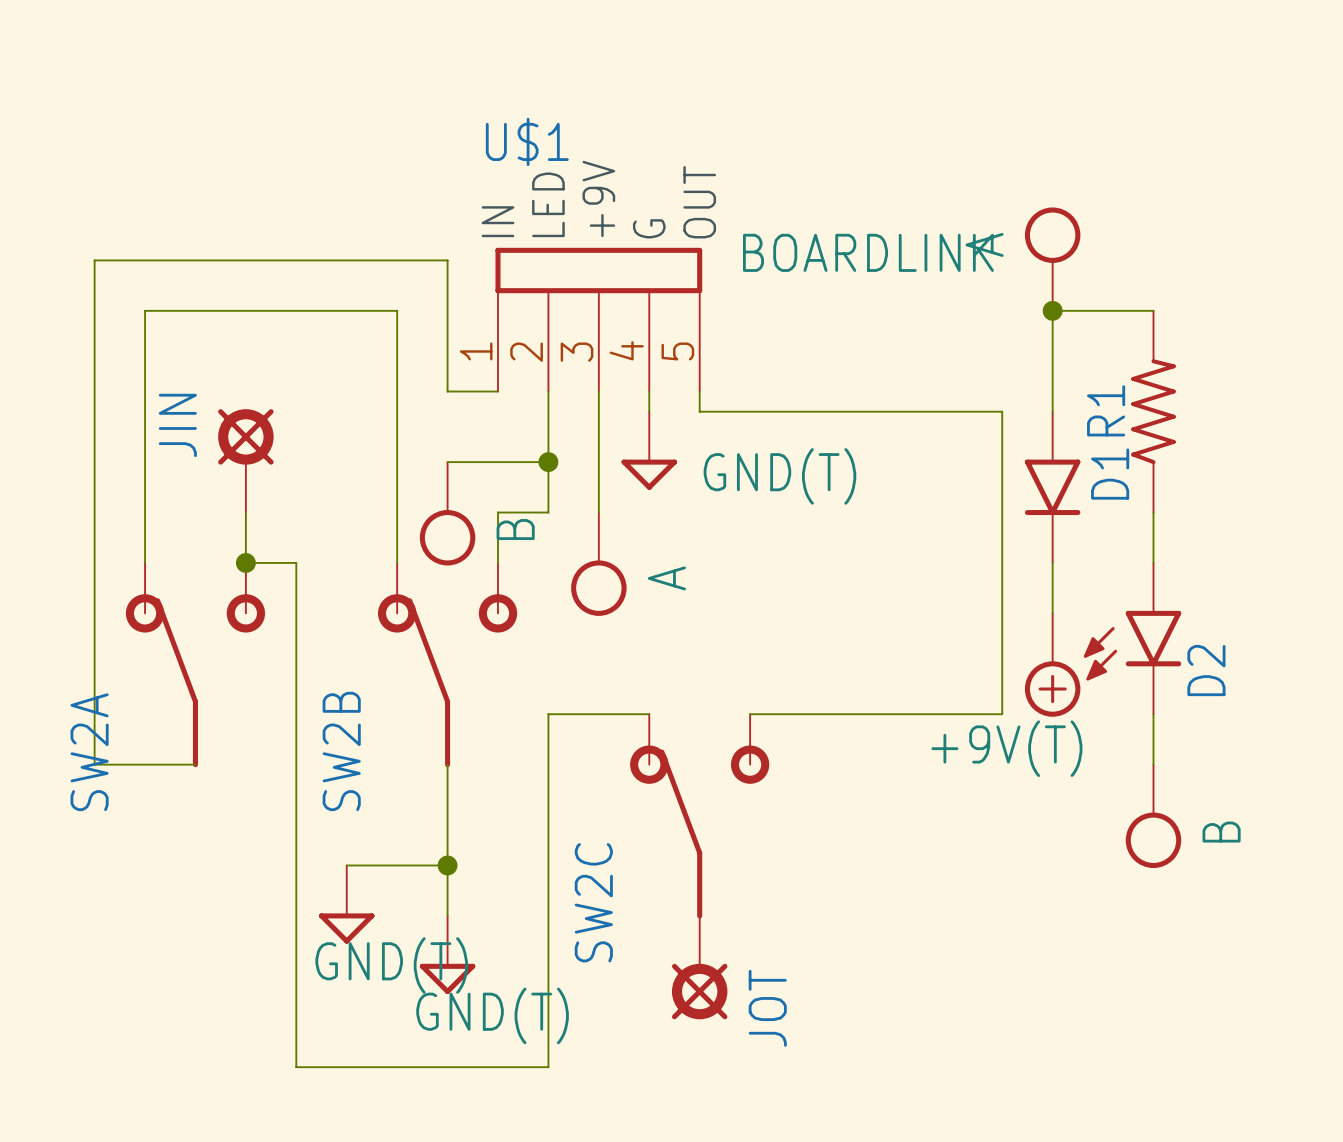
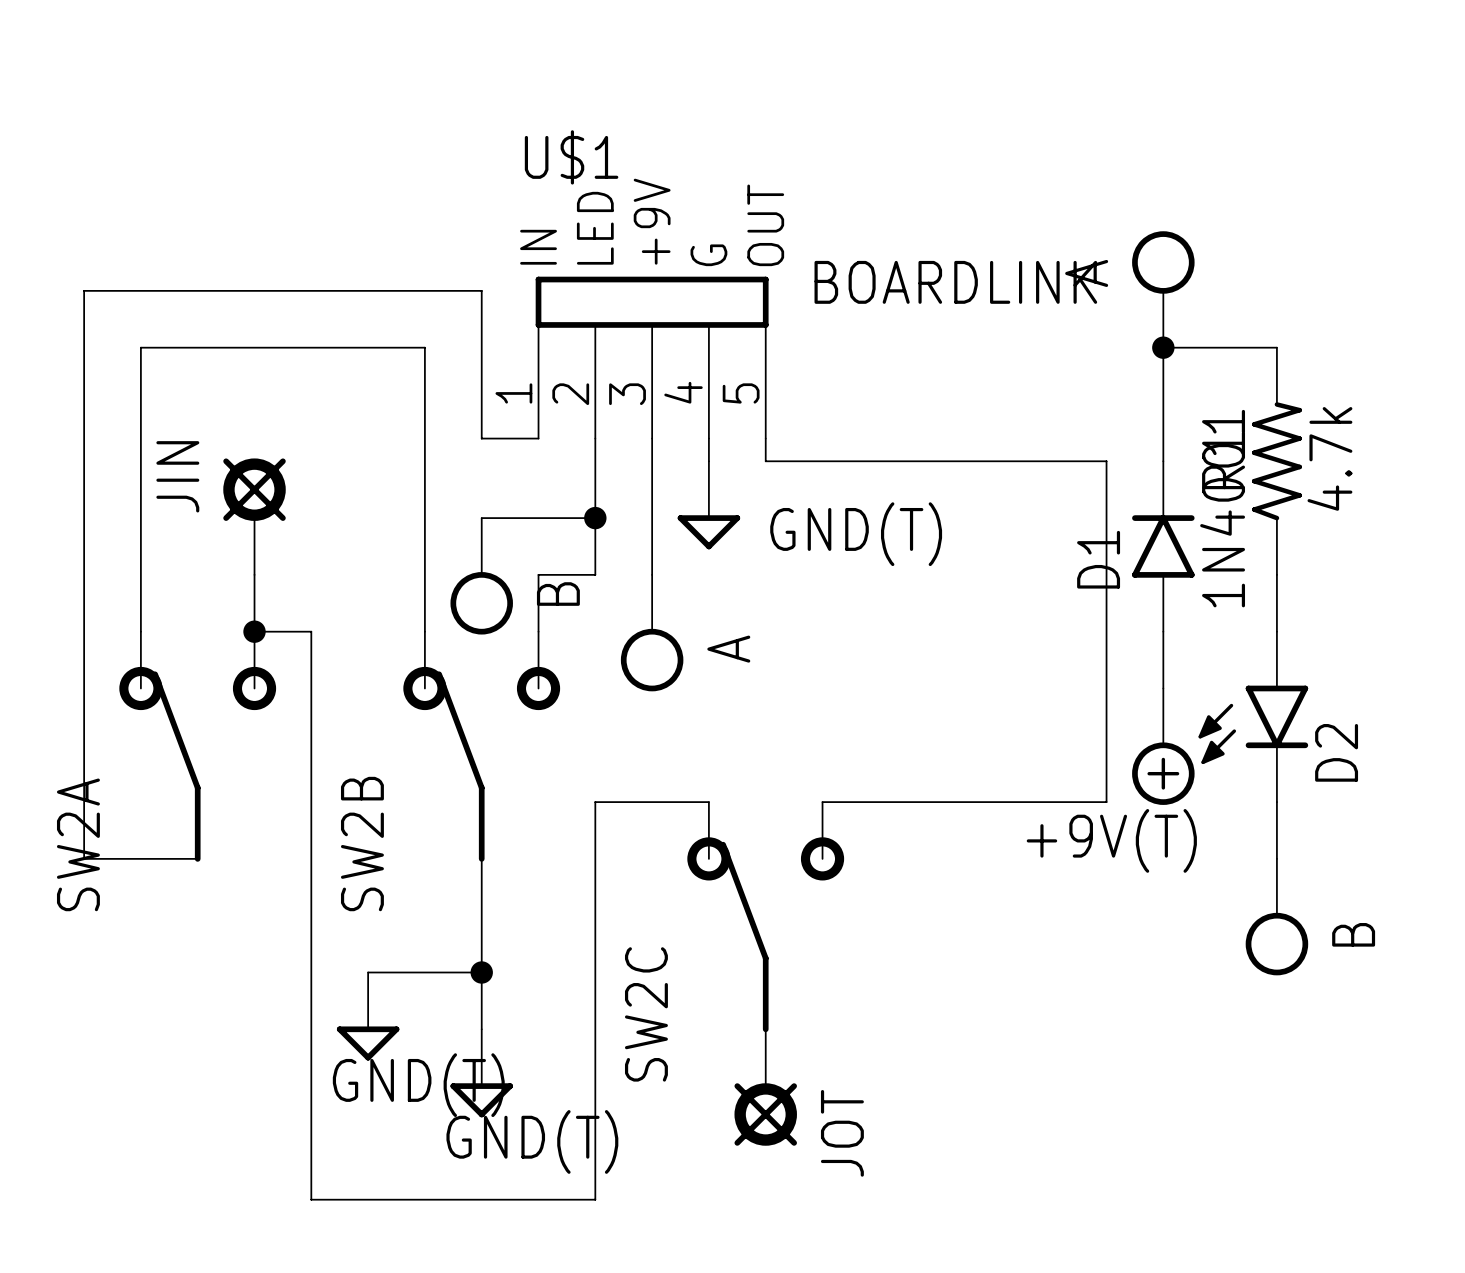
R1 value: none -> 4.7k (1329, 458)
D1 value: none -> 1N4001 (1222, 508)
D1 rotation: 0° (1052, 487) -> 180° (1163, 546)

